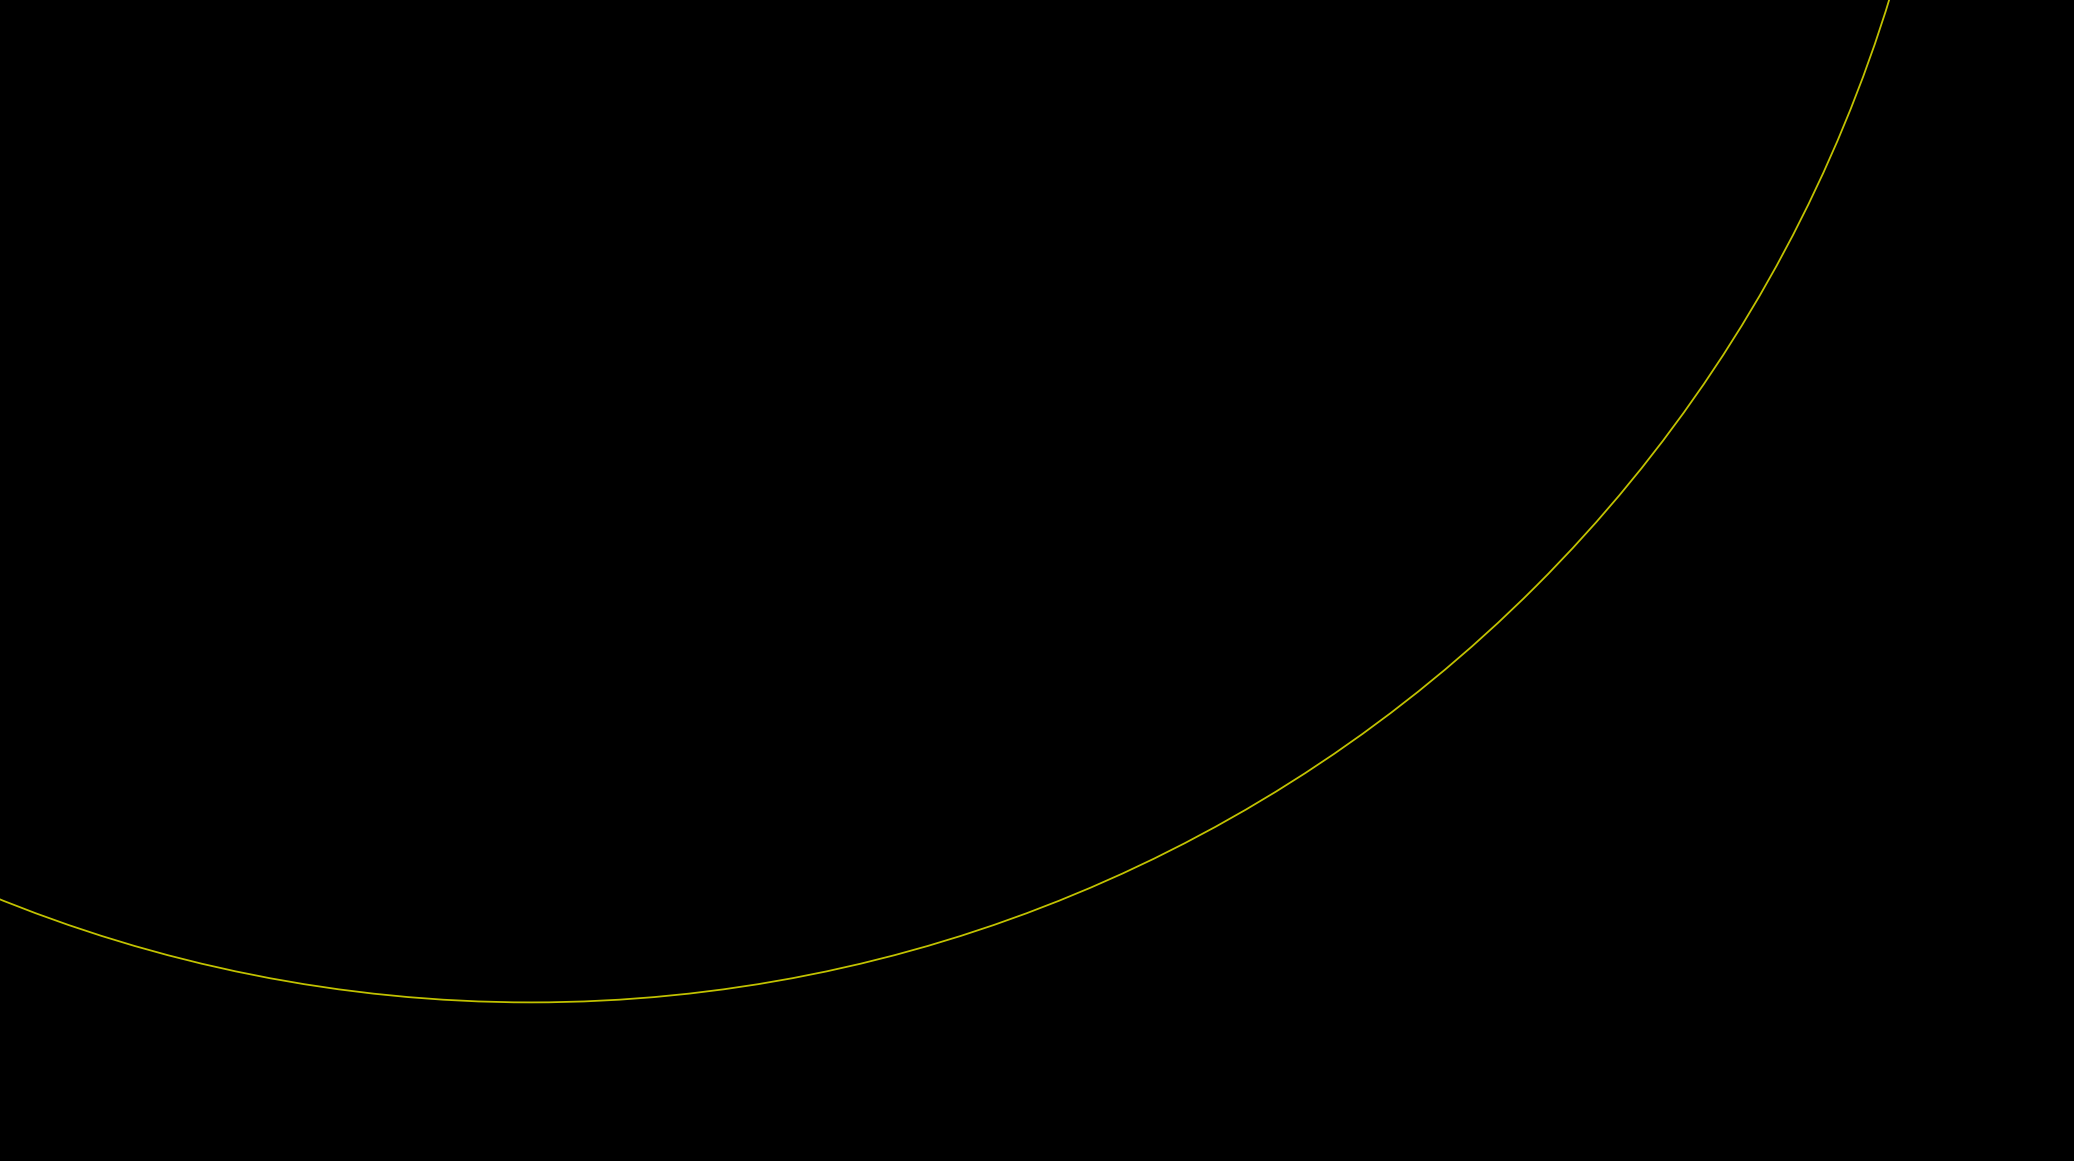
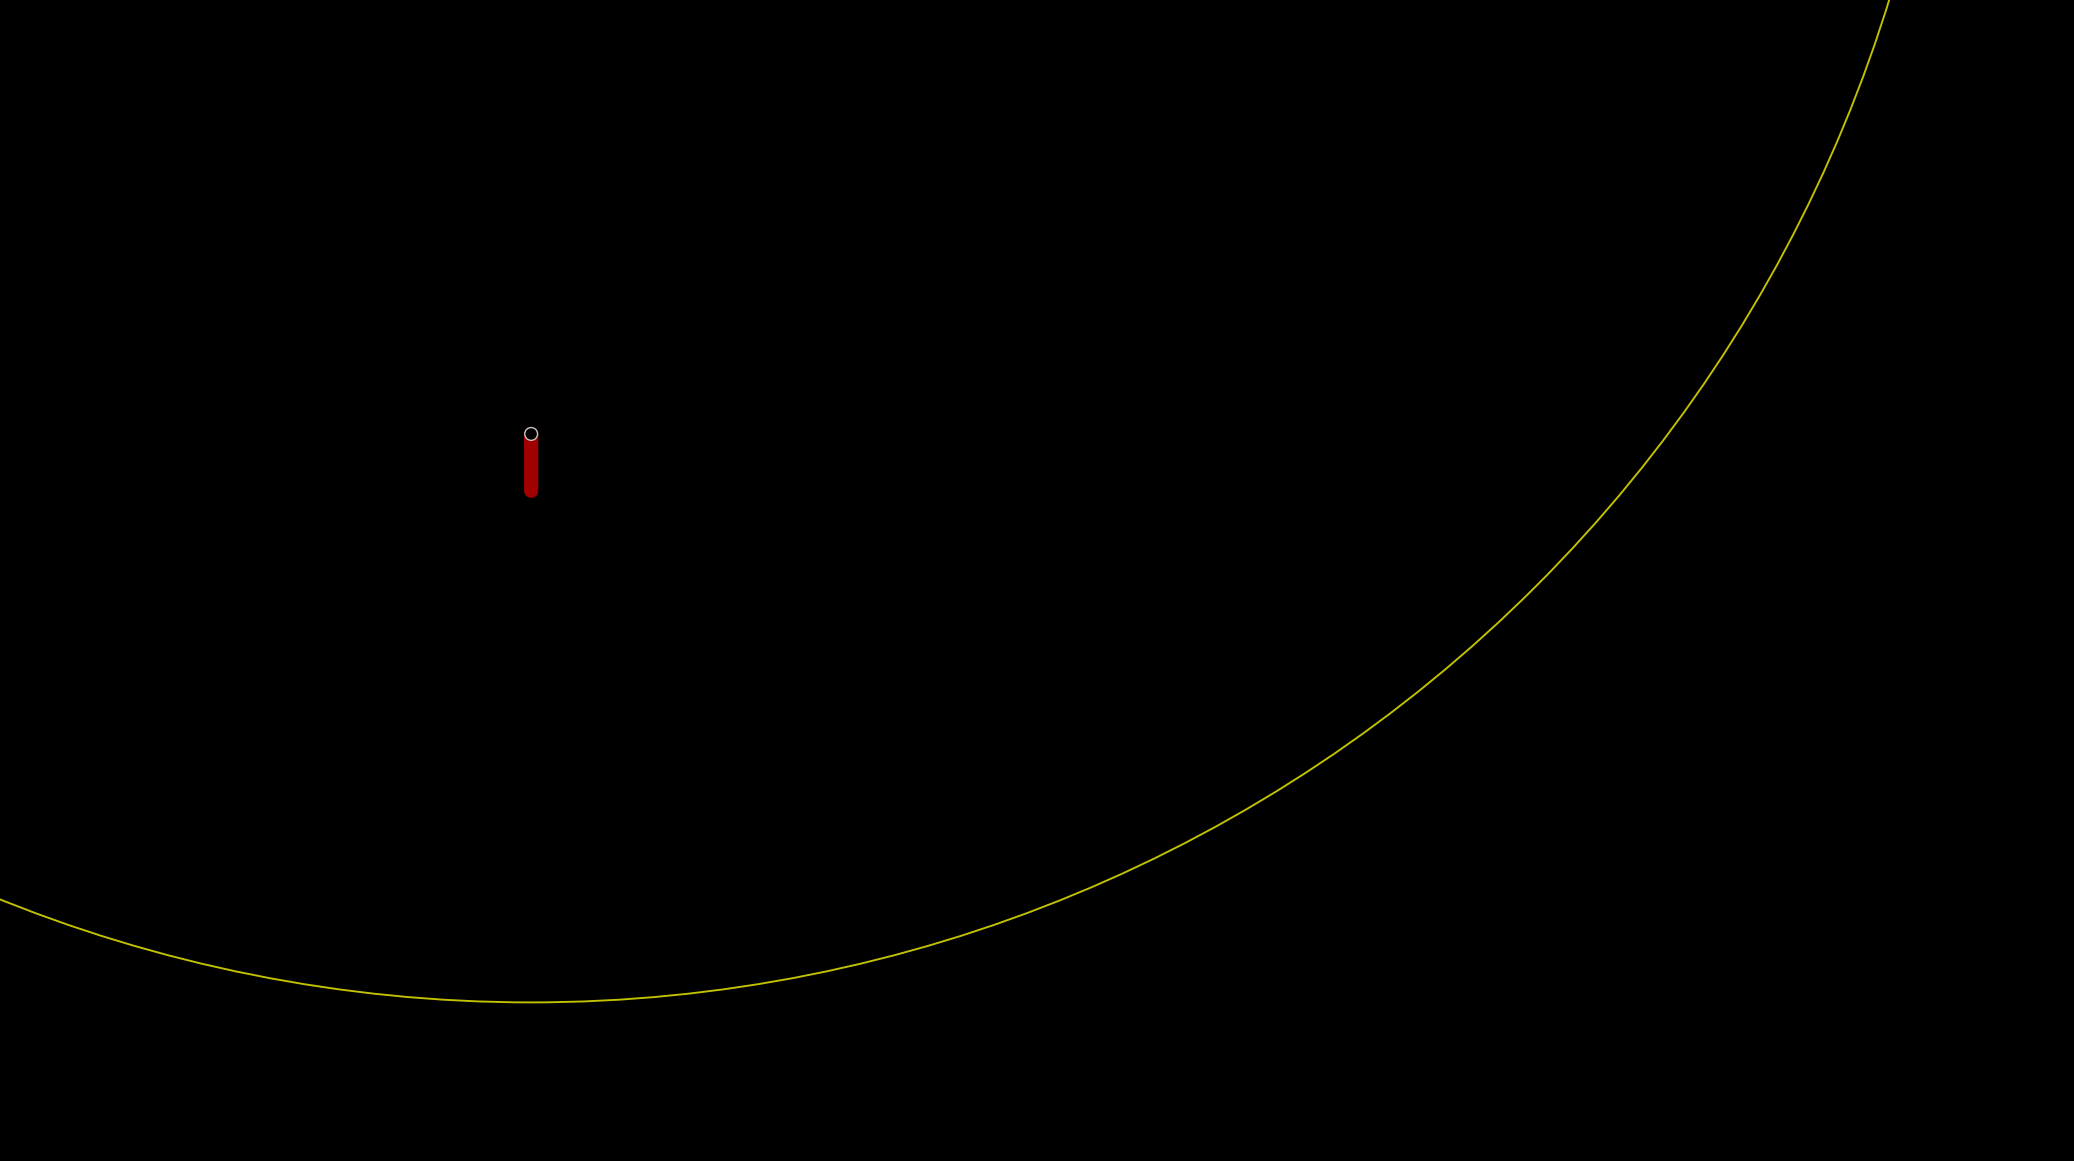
top track: none -> (531, 433) (531, 490)
via: none -> (531, 433)

